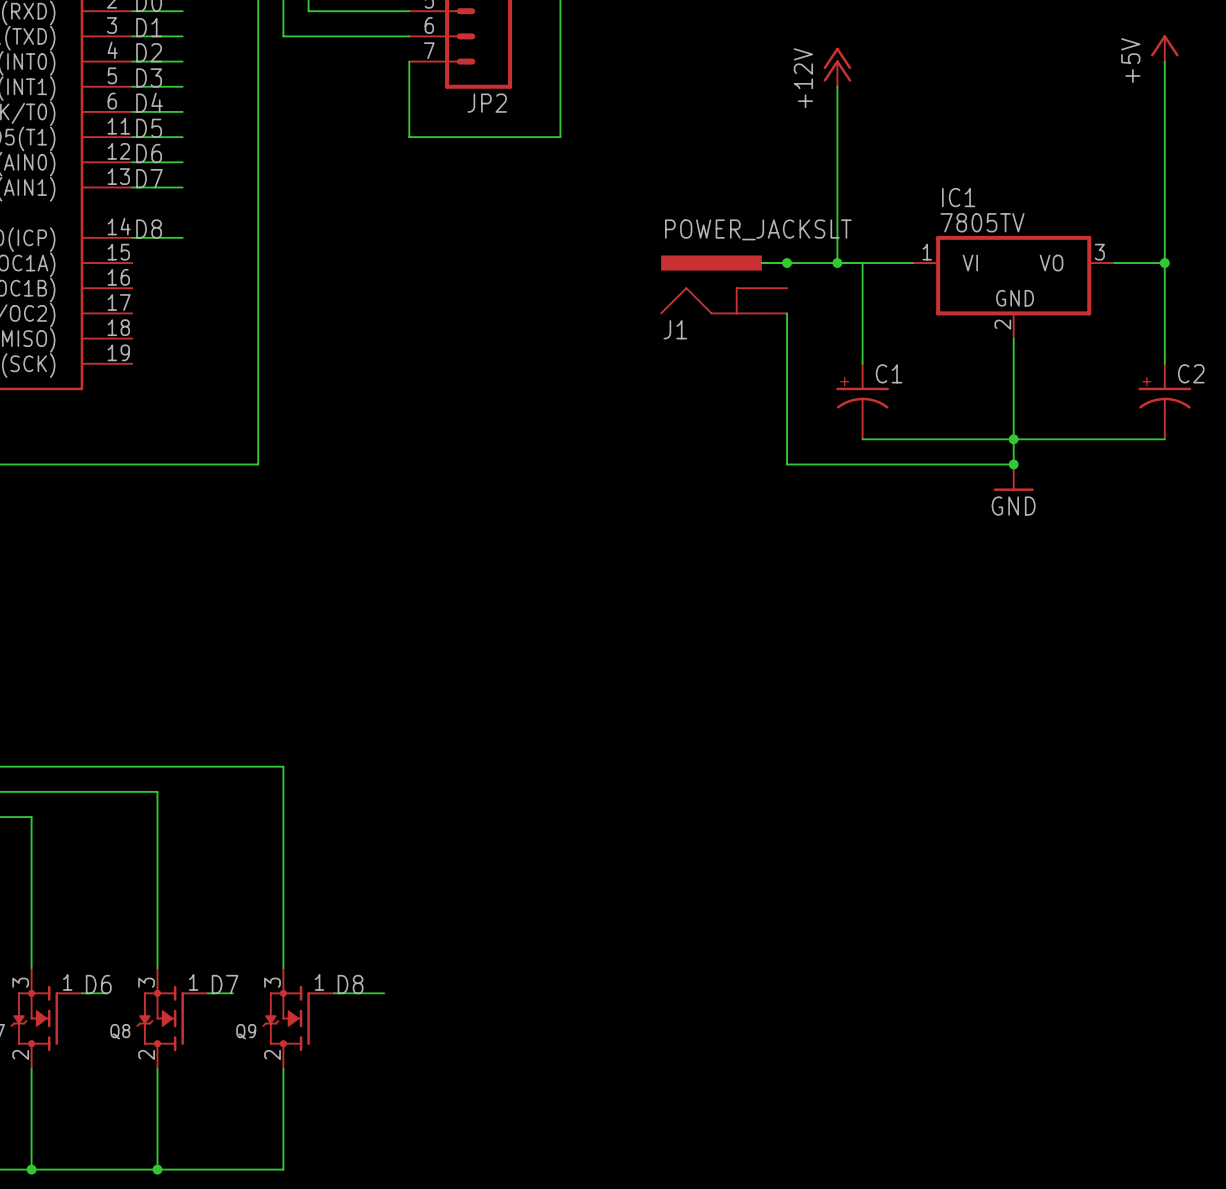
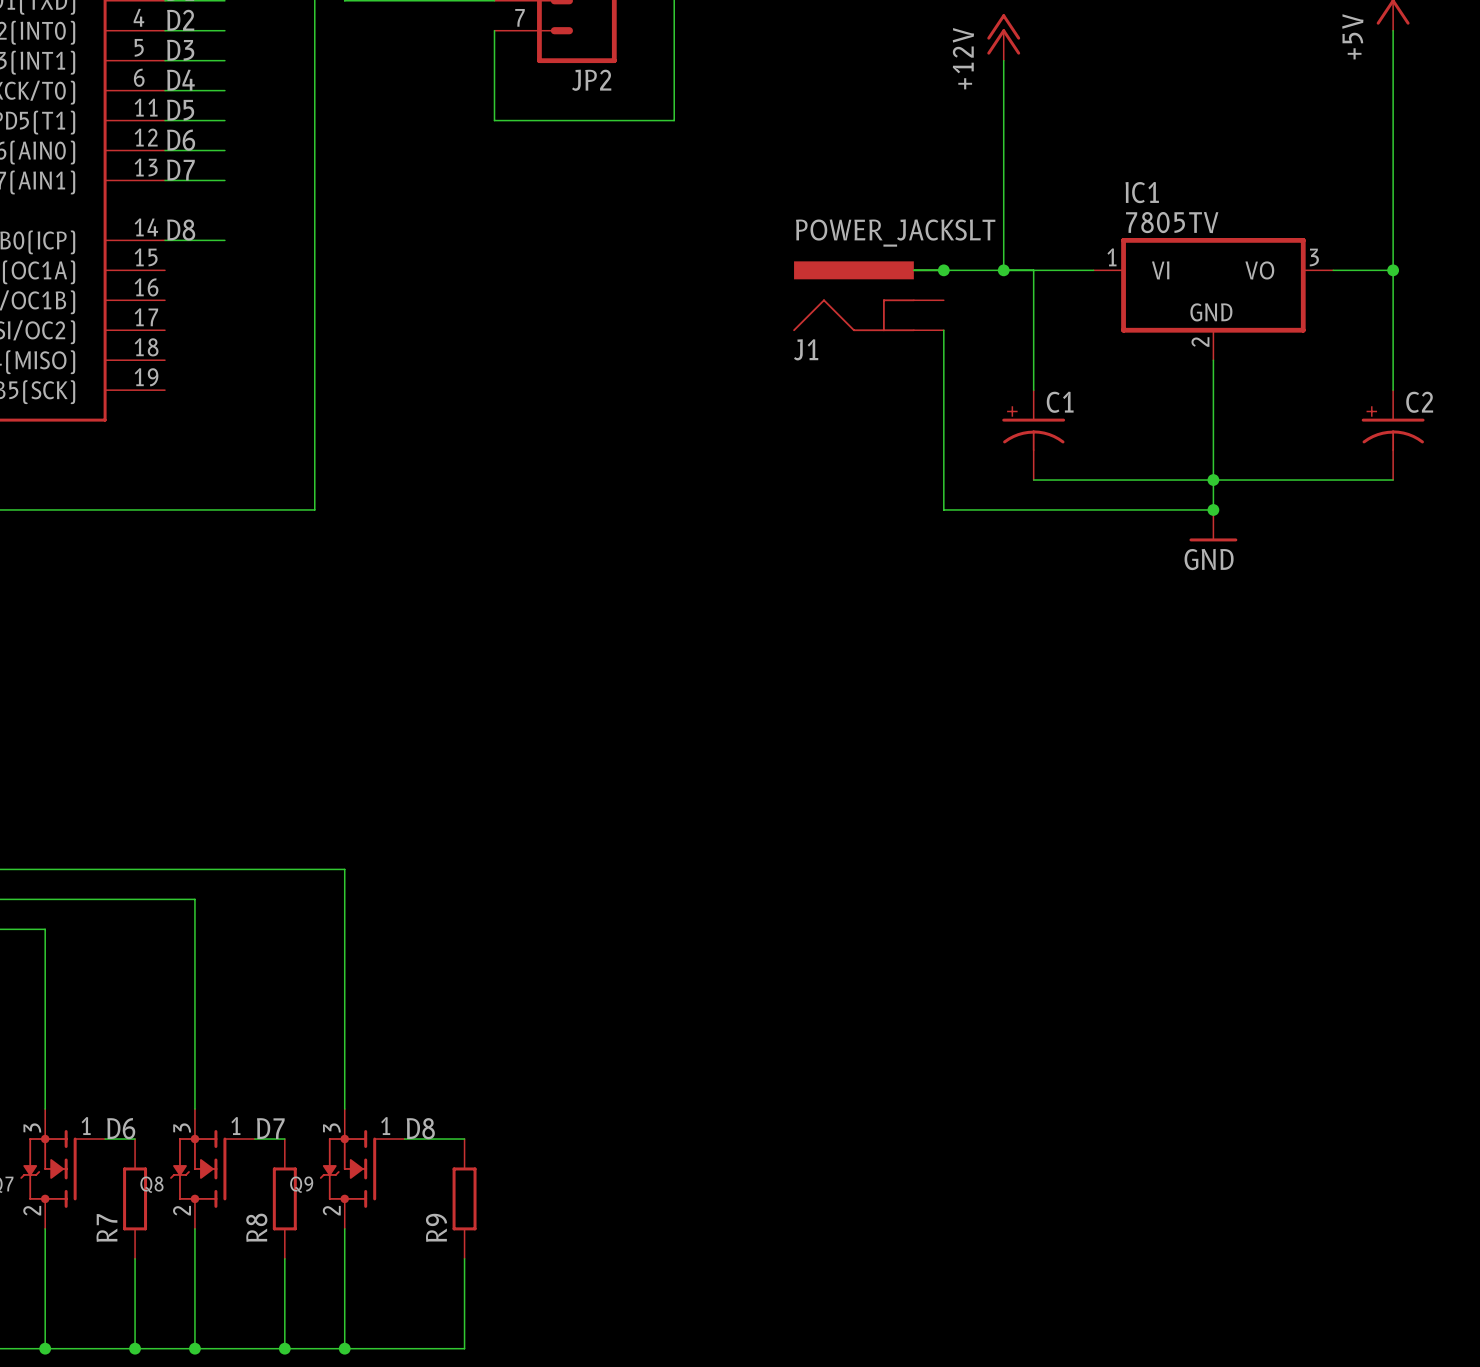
R7: none -> (135, 1198)
R8: none -> (284, 1198)
R9: none -> (464, 1198)
wire: none -> (135, 1258) (135, 1348)
wire: none -> (284, 1258) (284, 1348)
wire: none -> (464, 1258) (464, 1348) (344, 1348)
junction: none -> (135, 1348)
junction: none -> (284, 1348)
junction: none -> (344, 1348)

